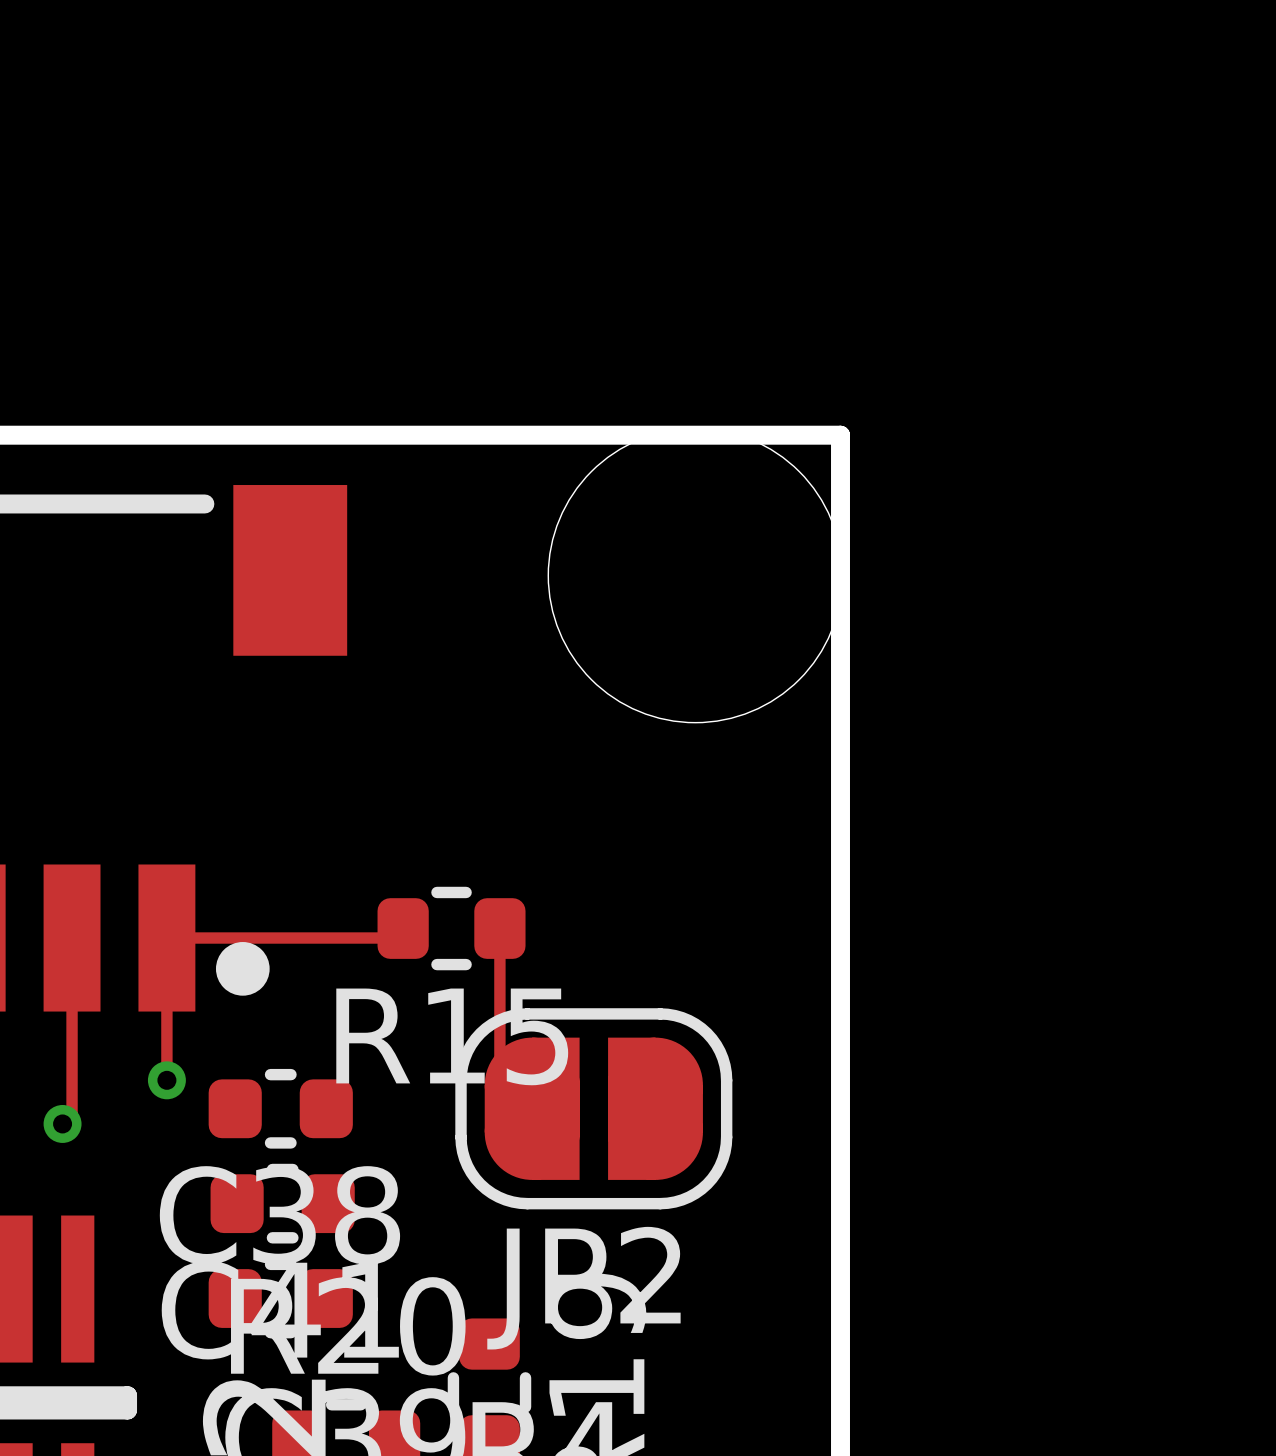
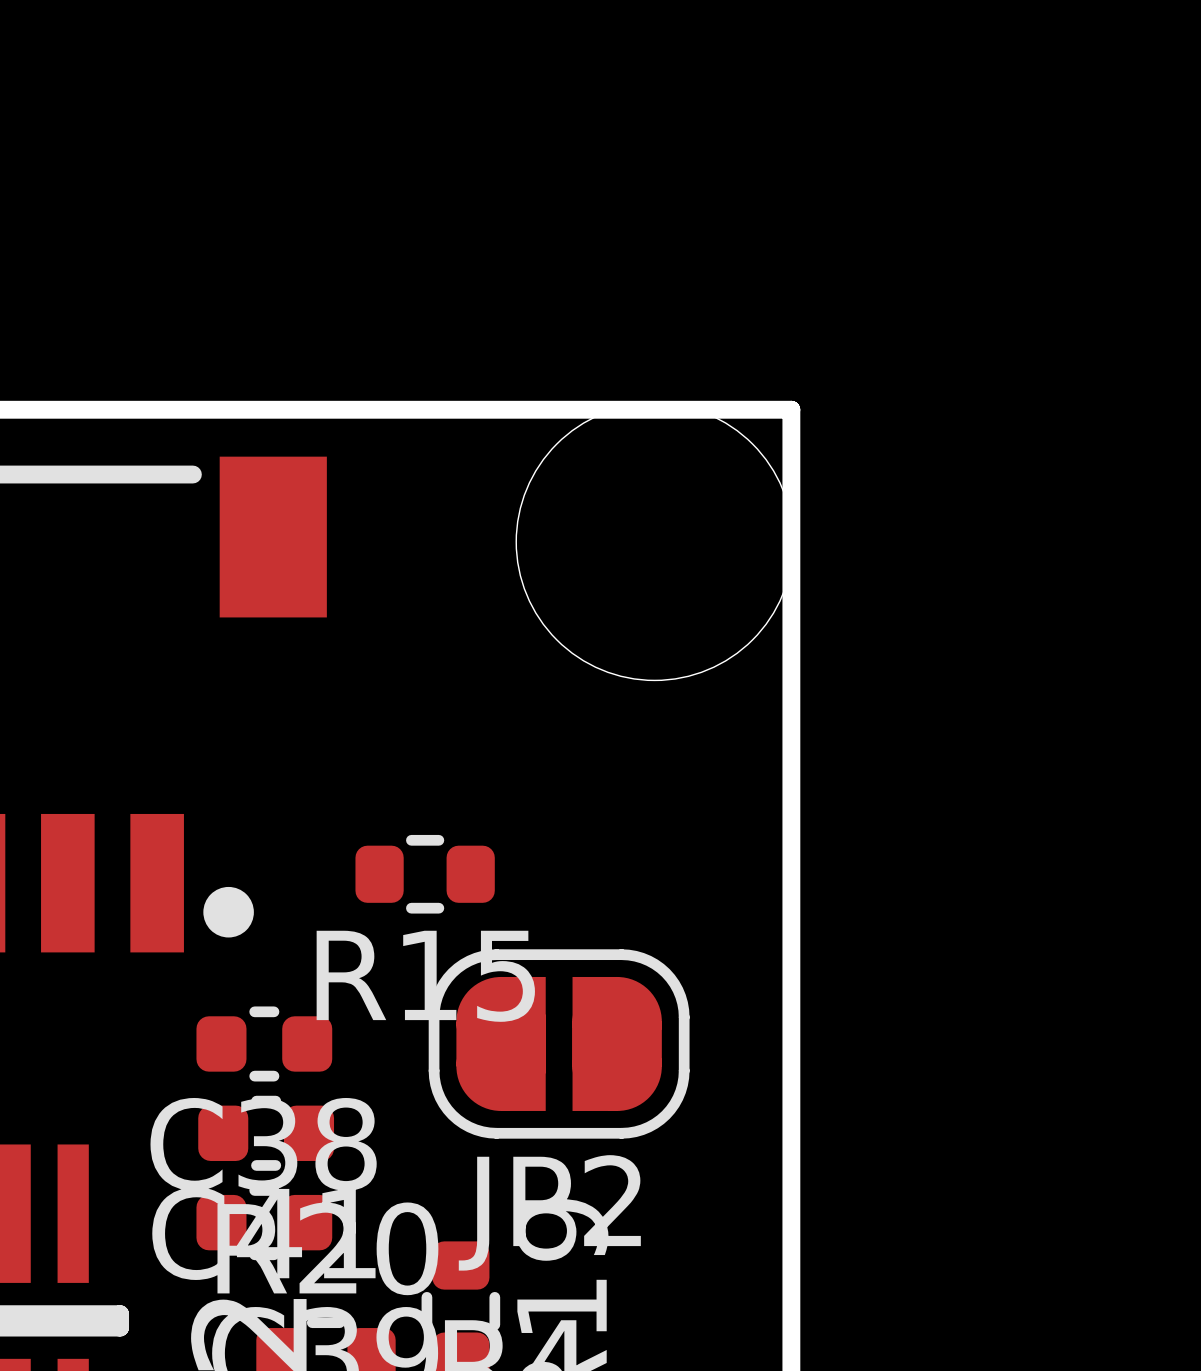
track: (403, 928) (393, 938) (166, 938) (166, 1080) -> none
track: (499, 928) (499, 1076) (532, 1108) -> none
track: (72, 938) (72, 1114) (62, 1123) -> none
via: (166, 1080) -> none
via: (62, 1123) -> none

